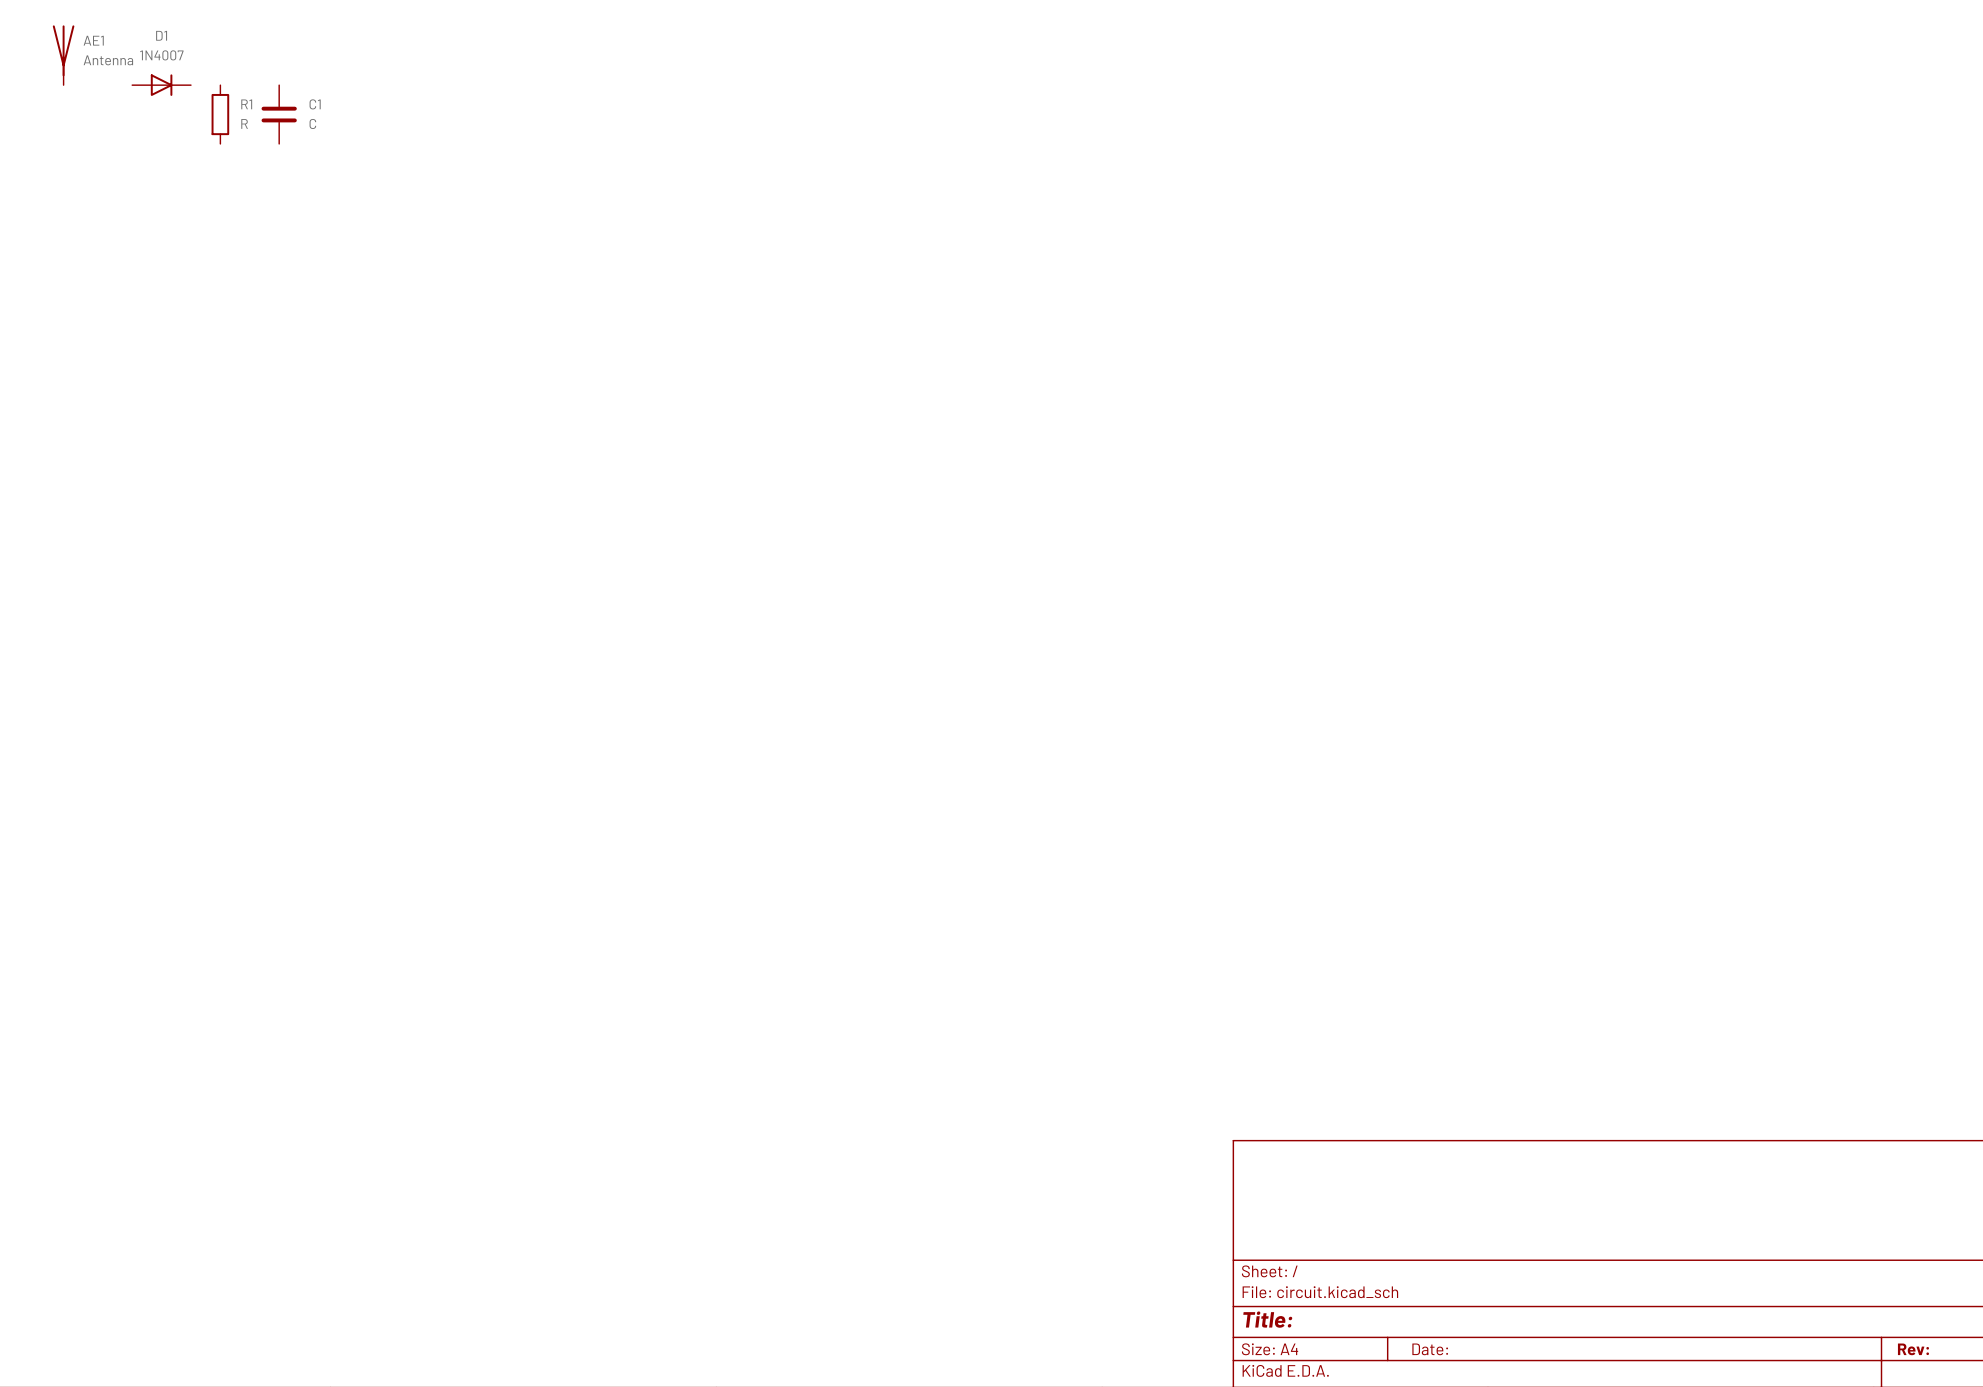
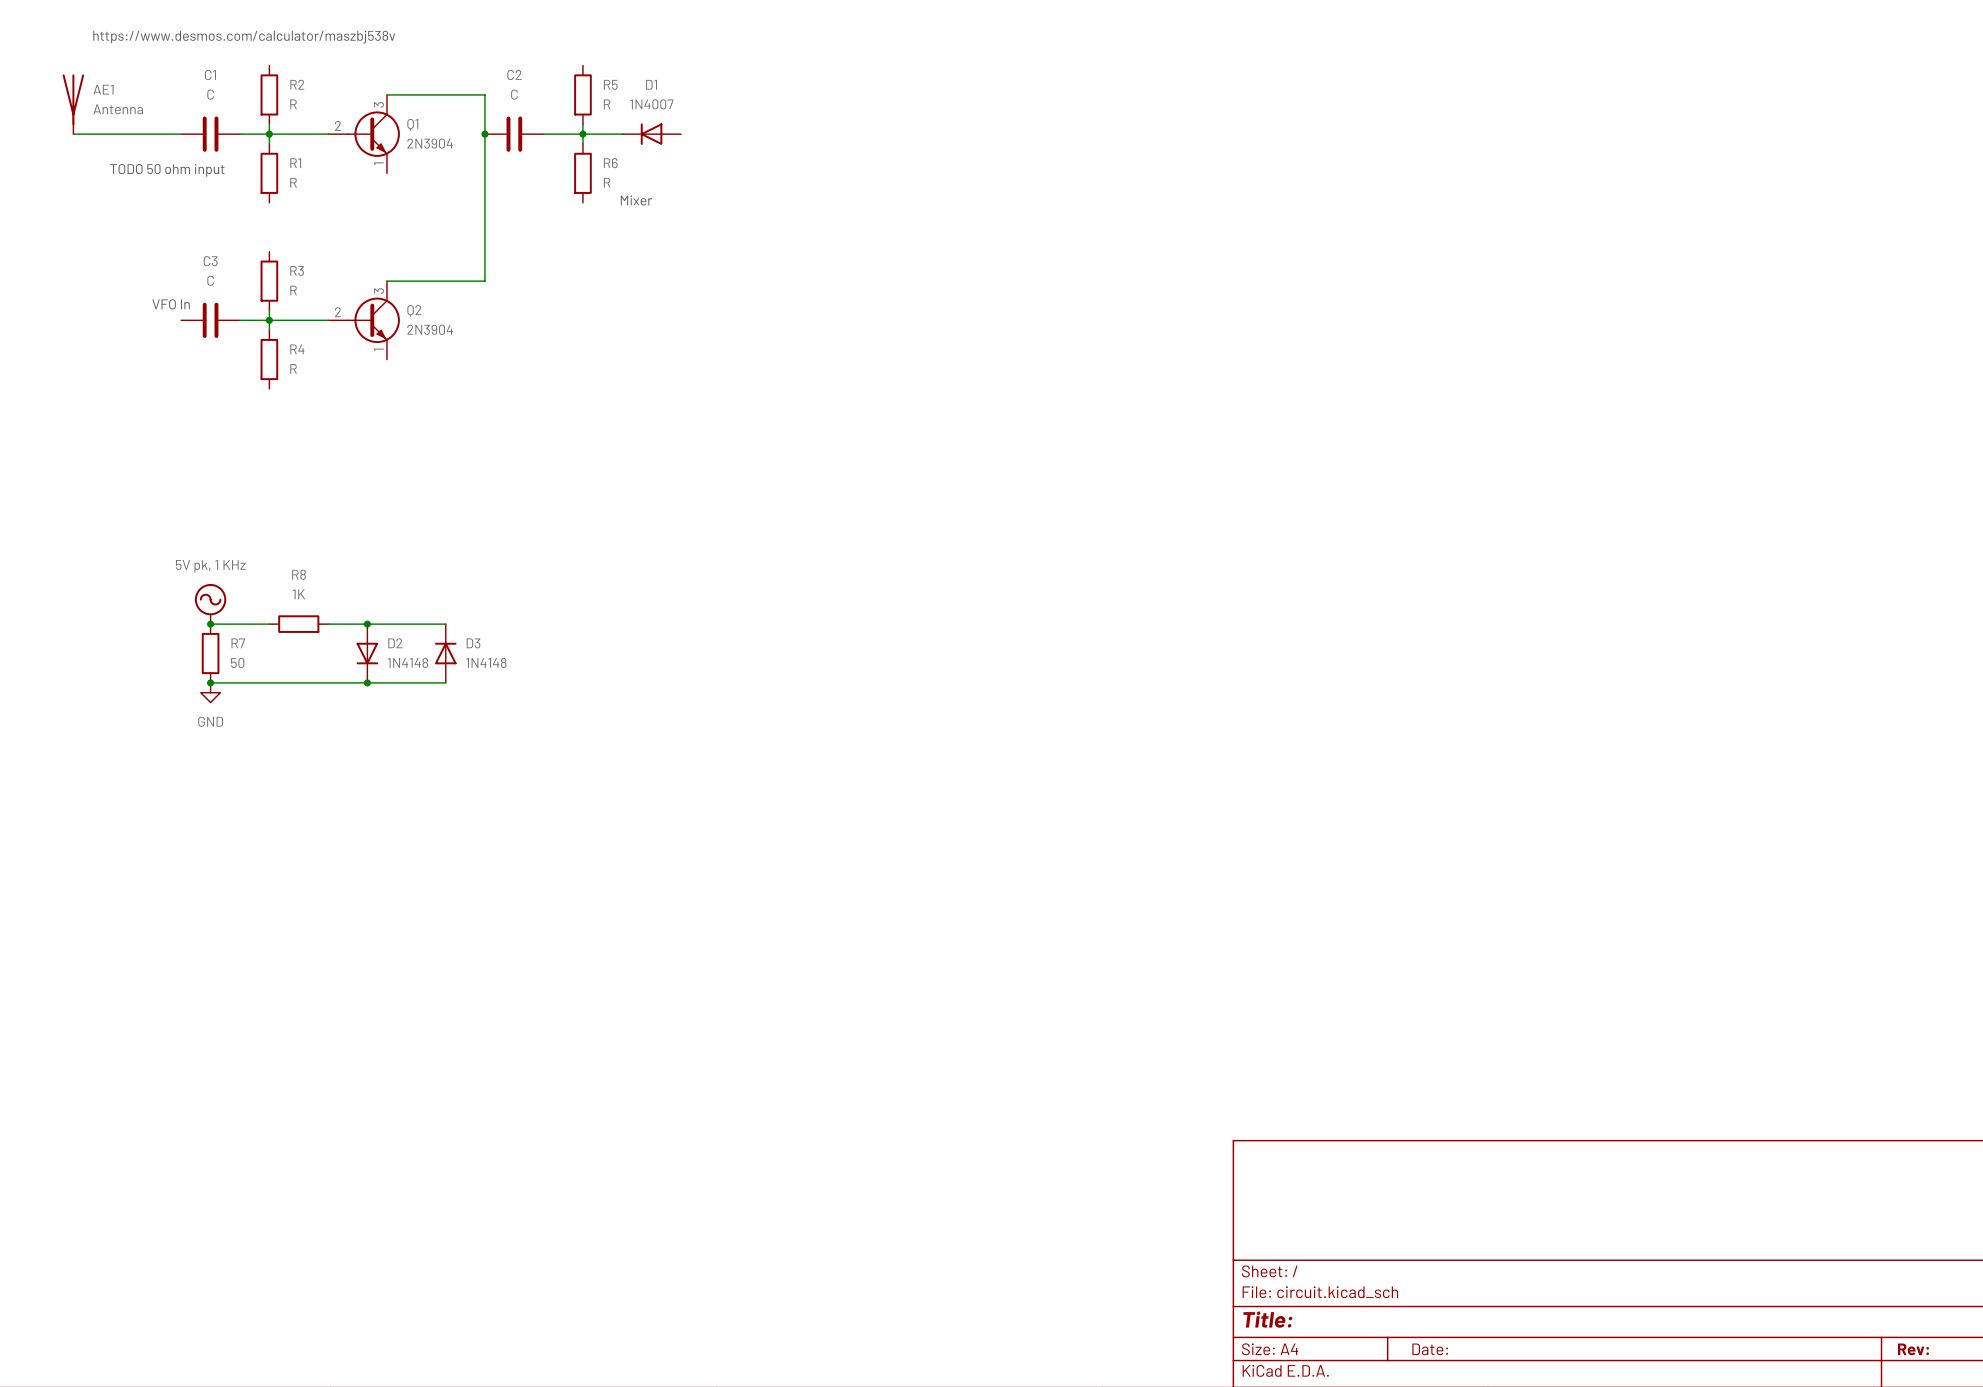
text: none -> https://www.desmos.com/calculator/maszbj538v (244, 37)
AE1 position: (63, 55) -> (73, 104)
D1 rotation: 0° (161, 85) -> 180° (651, 134)
D1 position: (161, 85) -> (651, 134)
R2: none -> R (269, 94)
wire: none -> (386, 94) (484, 94) (484, 281) (386, 281)
R5: none -> R (582, 94)
C1 name position: C1 (315, 104) -> C1 (210, 74)
R1 position: (220, 114) -> (269, 173)
C1 rotation: 0° (279, 114) -> 90° clockwise (210, 134)
C1 position: (279, 114) -> (210, 134)
C1 value position: C (312, 123) -> C (210, 94)
wire: none -> (269, 124) (269, 143)
wire: none -> (582, 124) (582, 143)
wire: none -> (73, 134) (181, 134)
wire: none -> (239, 134) (328, 134)
junction: none -> (269, 134)
Q1: none -> 2N3904 (364, 134)
junction: none -> (484, 134)
C2: none -> C (514, 134)
wire: none -> (543, 134) (622, 134)
junction: none -> (582, 134)
text: none -> TODO 50 ohm input (167, 170)
R6: none -> R (582, 173)
text: none -> Mixer (636, 200)
R3: none -> R (269, 281)
text: none -> VFO In (171, 304)
wire: none -> (269, 310) (269, 330)
C3: none -> C (210, 320)
wire: none -> (239, 320) (328, 320)
junction: none -> (269, 320)
Q2: none -> 2N3904 (364, 320)
R4: none -> R (269, 359)
power symbol: none -> 5V pk, 1 KHz (210, 604)
wire: none -> (210, 624) (269, 624)
junction: none -> (210, 624)
R8: none -> 1K (298, 624)
wire: none -> (328, 624) (445, 624)
junction: none -> (367, 624)
R7: none -> 50 (210, 653)
D2: none -> 1N4148 (367, 653)
D3: none -> 1N4148 (445, 653)
wire: none -> (210, 682) (445, 682)
junction: none -> (210, 682)
junction: none -> (367, 682)
power symbol: none -> GND (210, 692)

